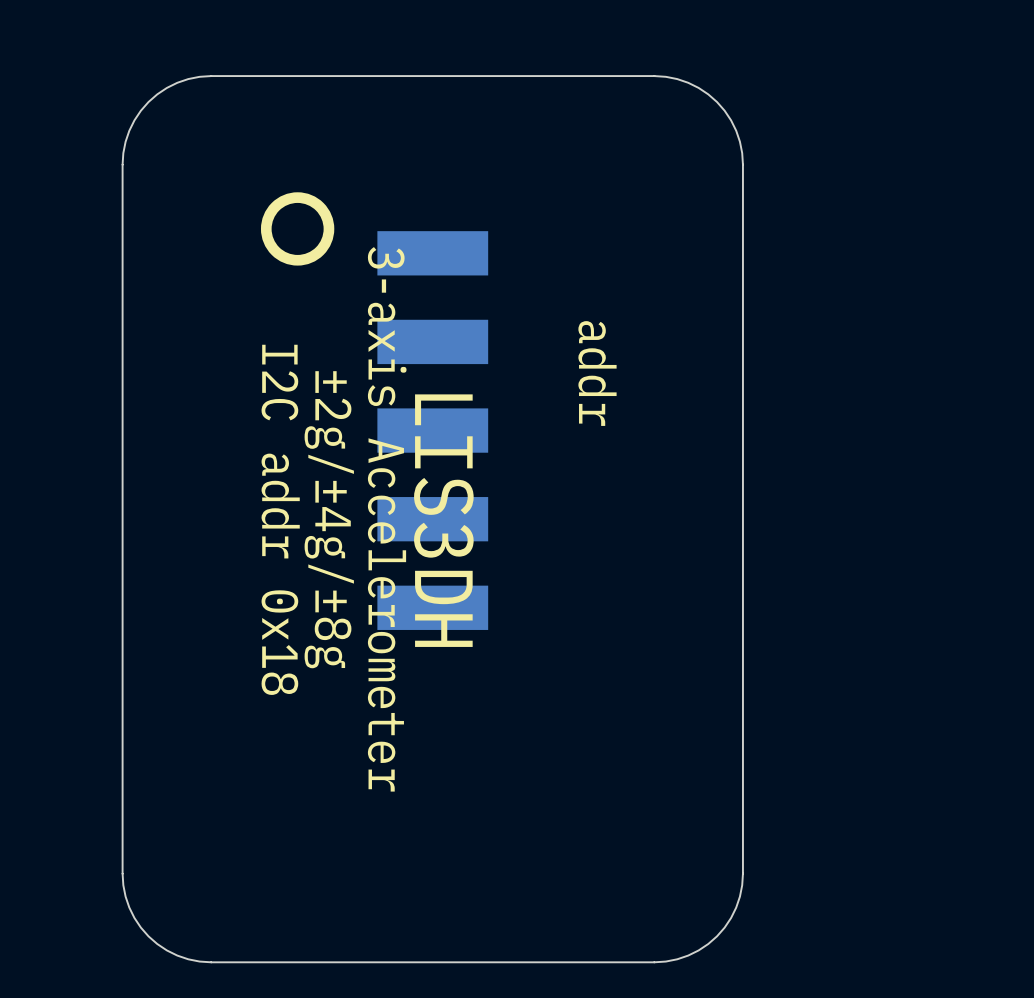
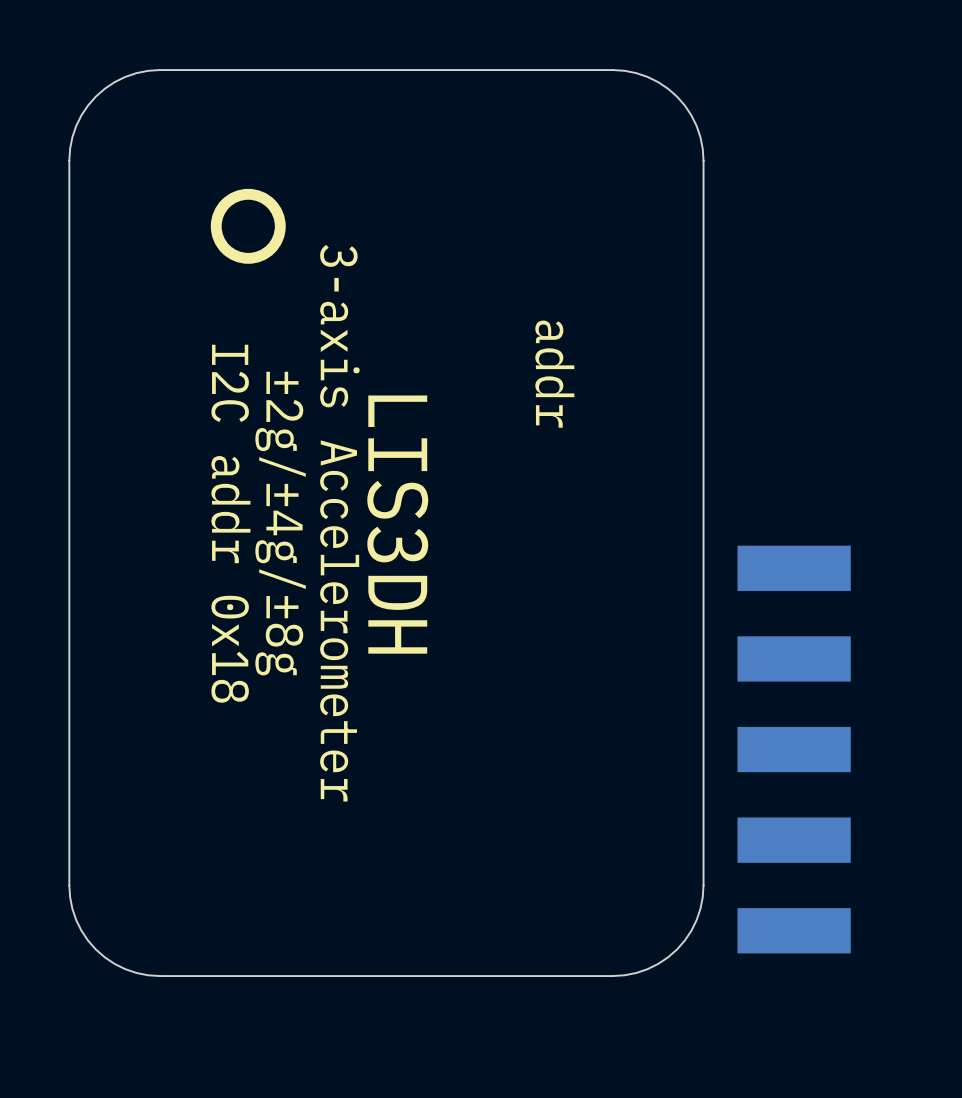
part position: (432, 430) -> (794, 749)

